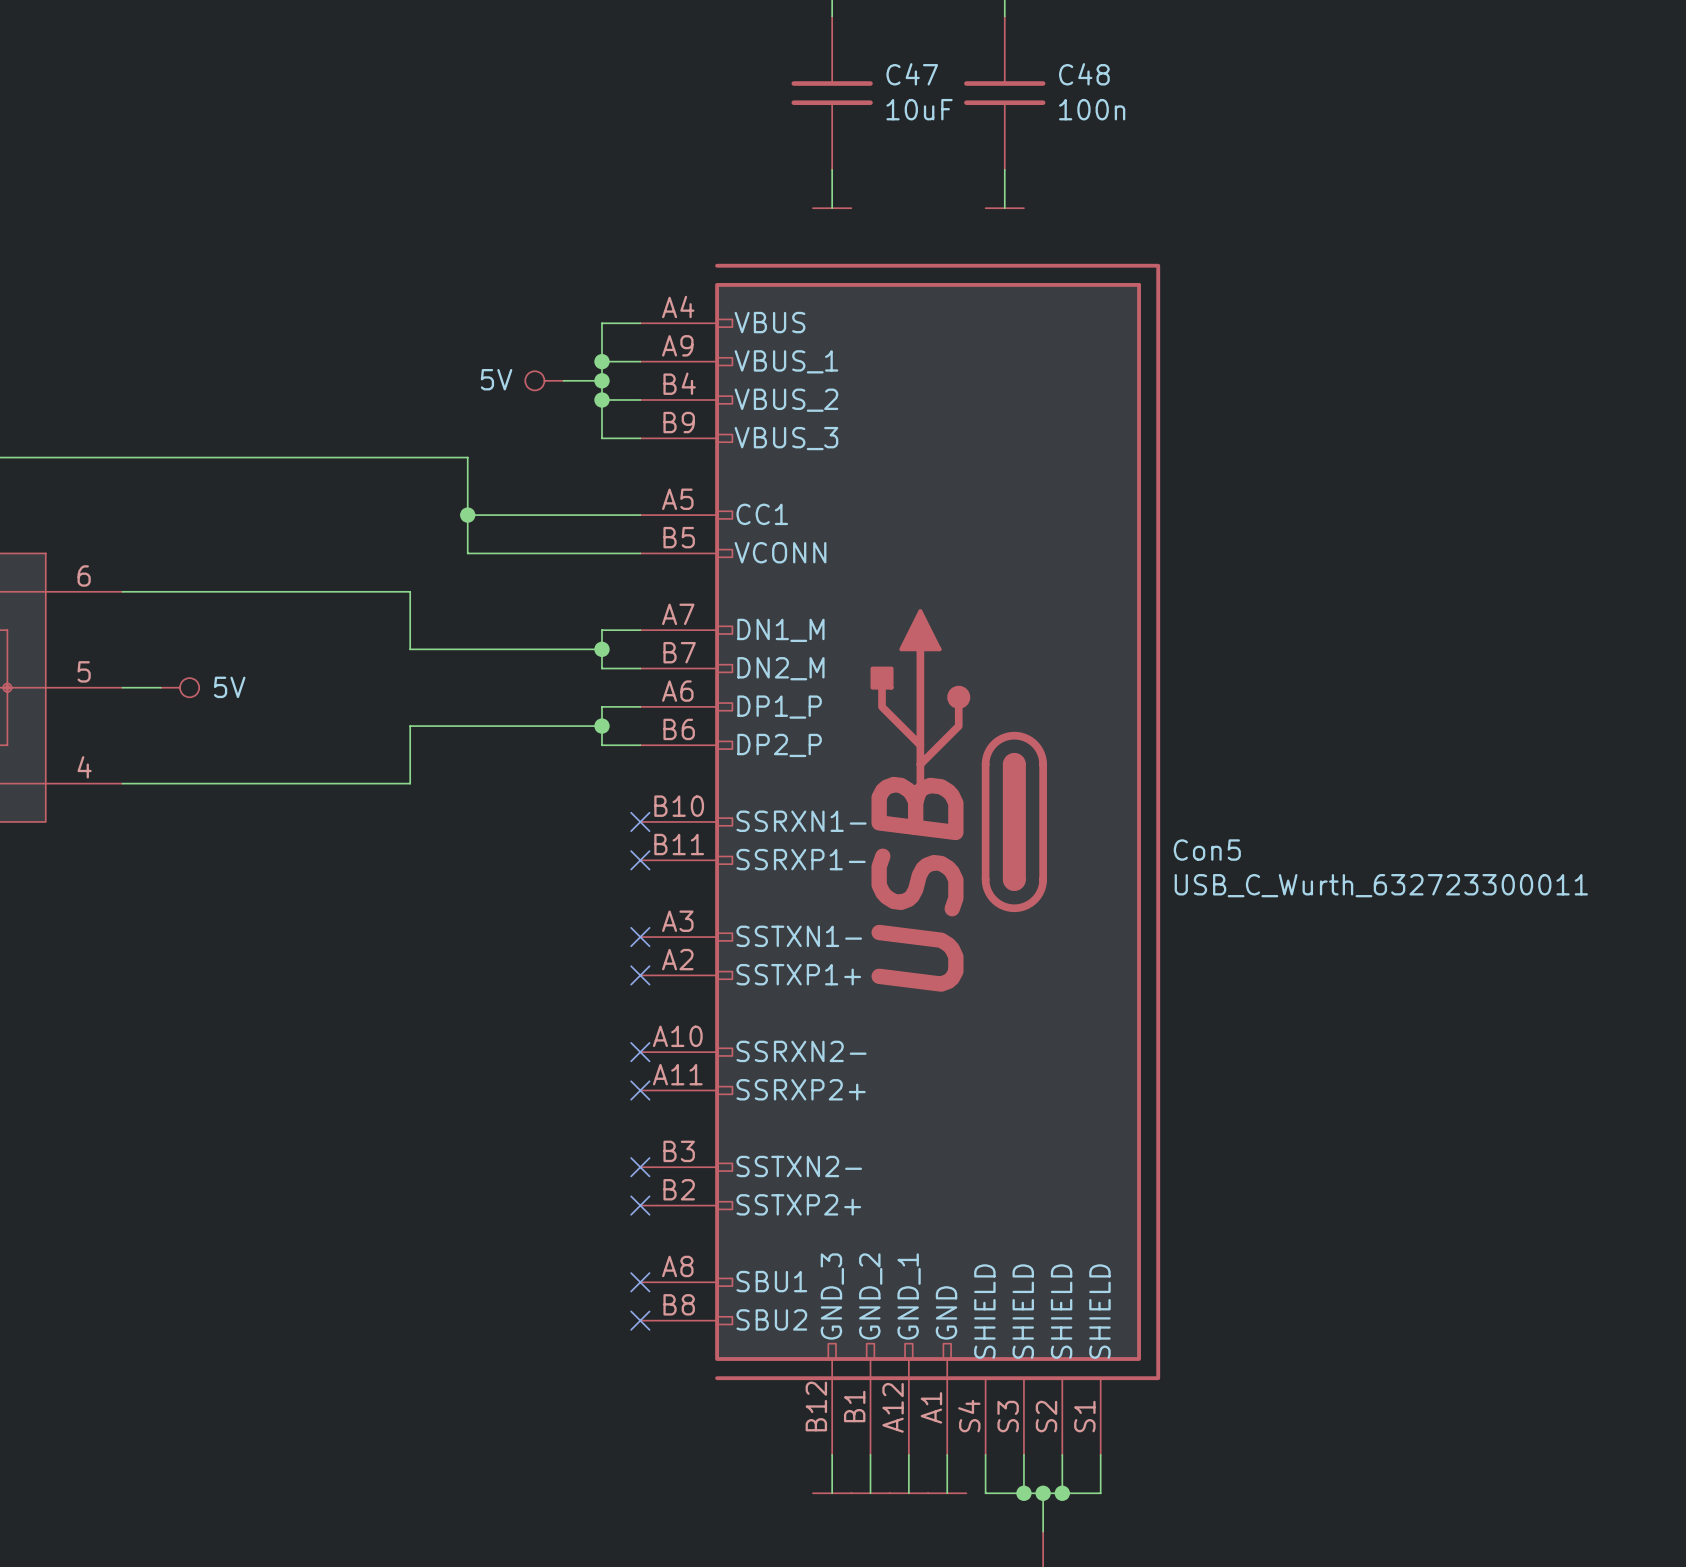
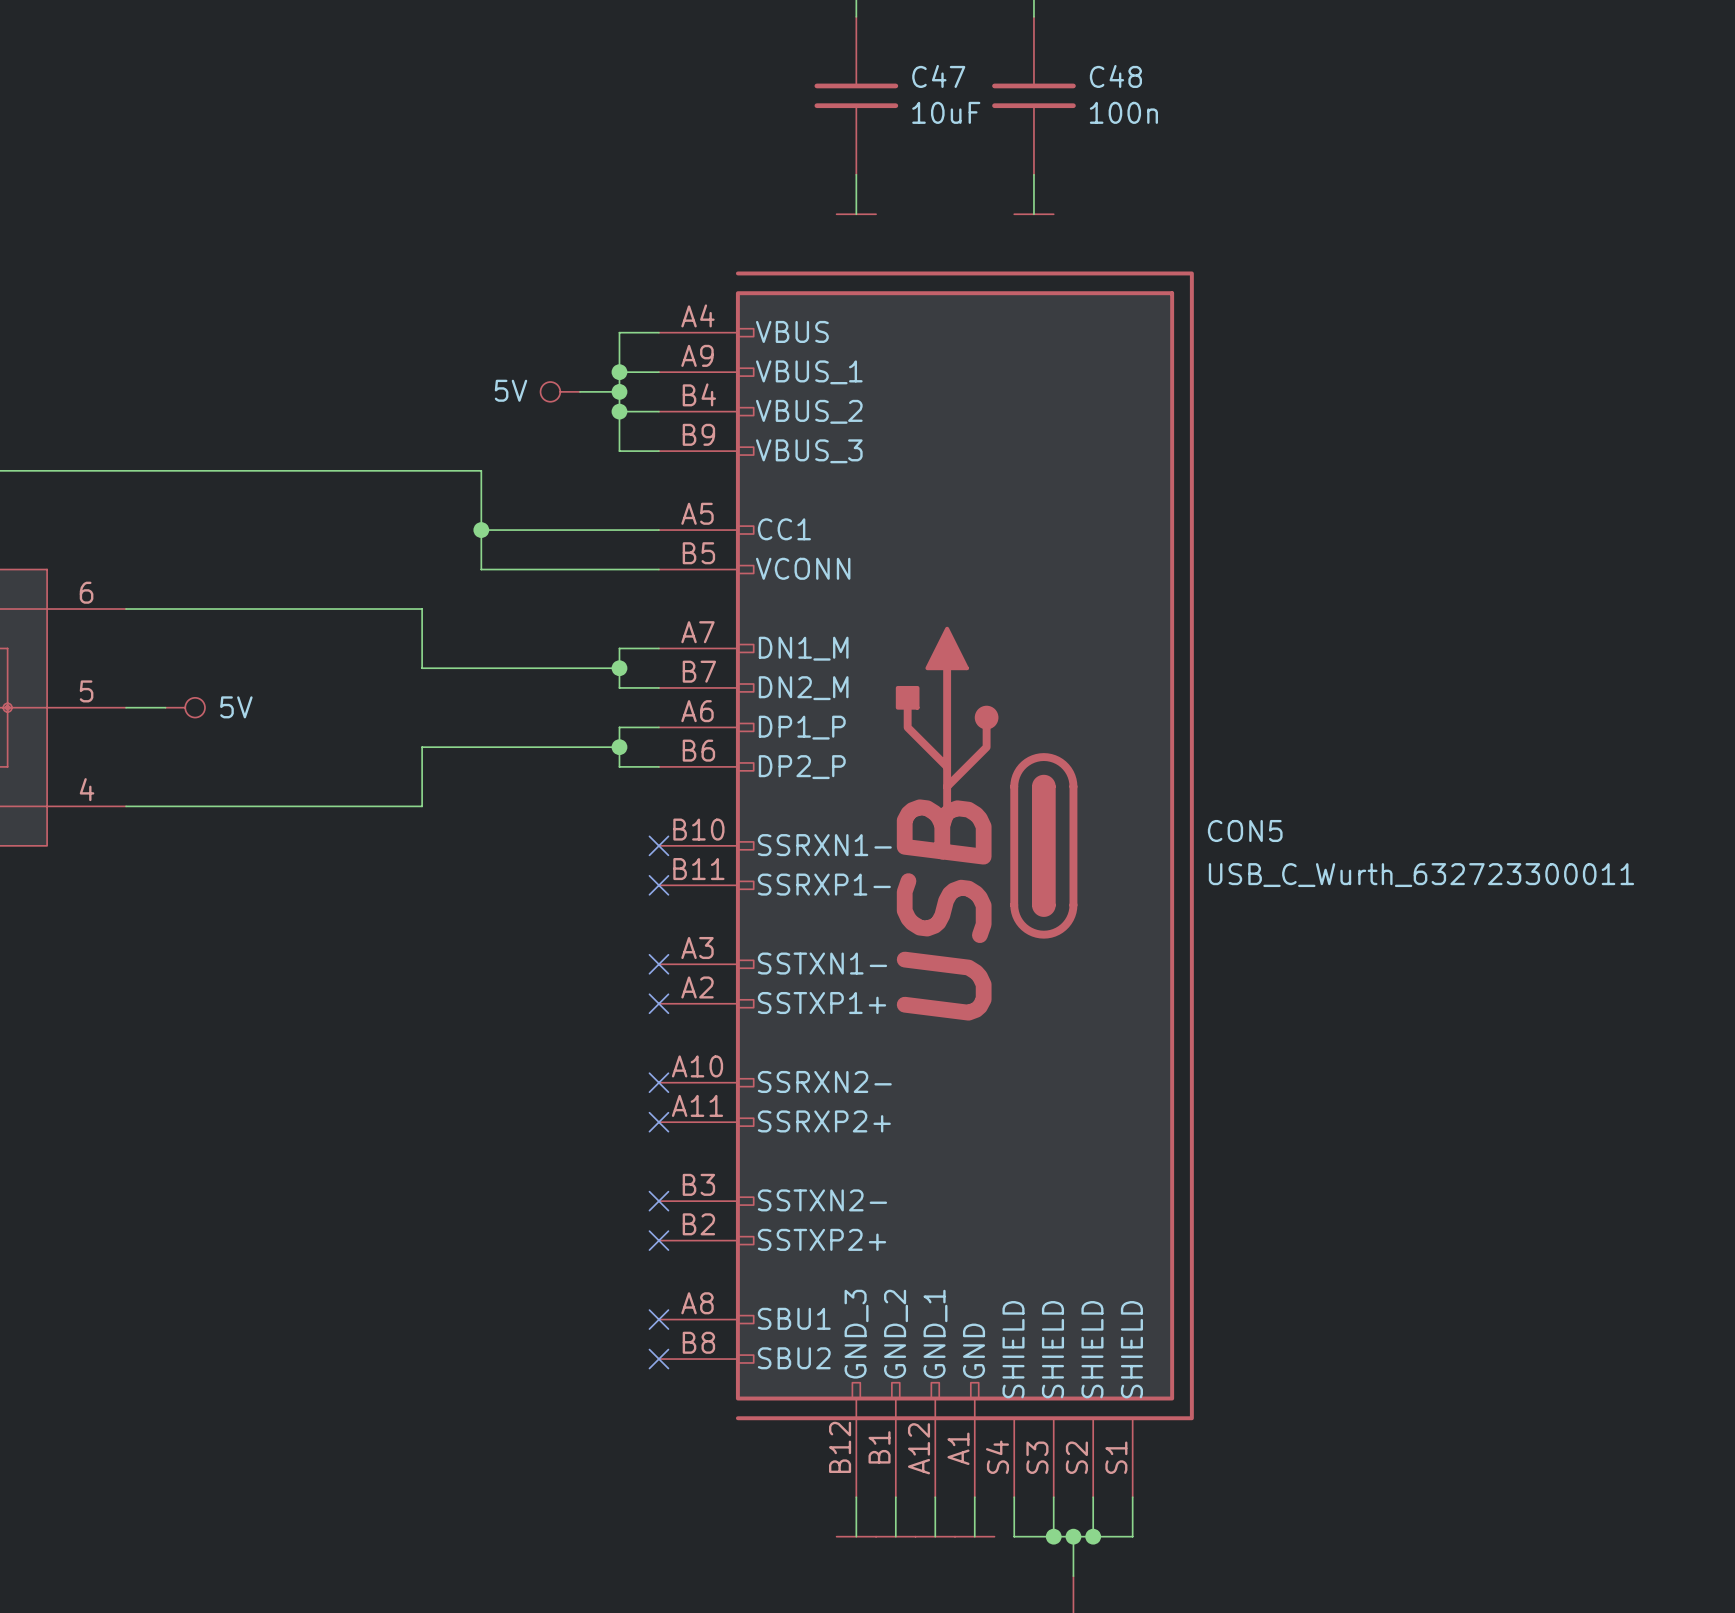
Con5 name: Con5 (1207, 850) -> CON5 (1245, 831)
Con5 value position: USB_C_Wurth_632723300011 (1381, 885) -> USB_C_Wurth_632723300011 (1421, 875)

